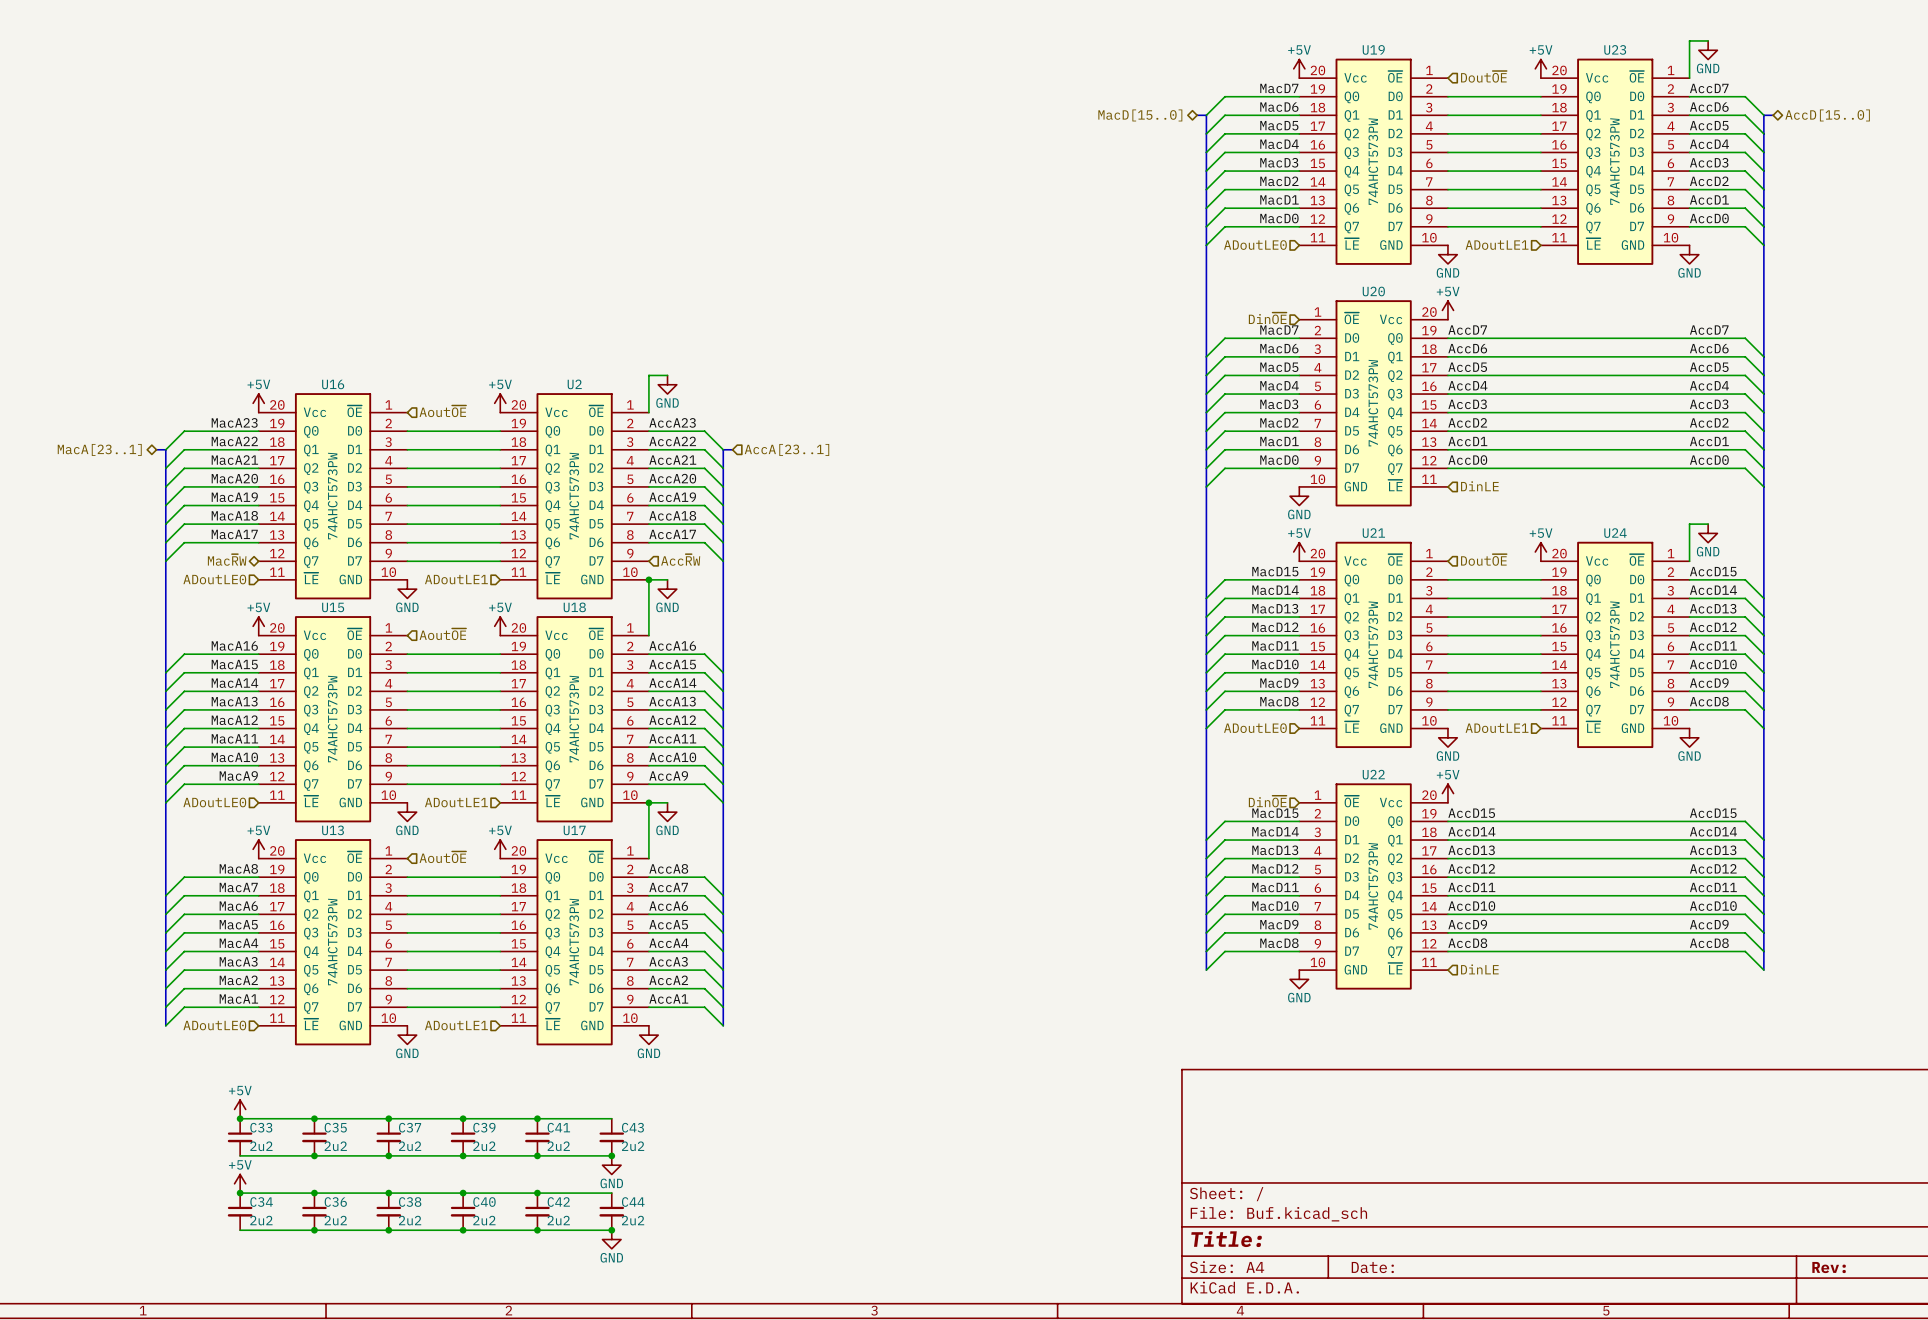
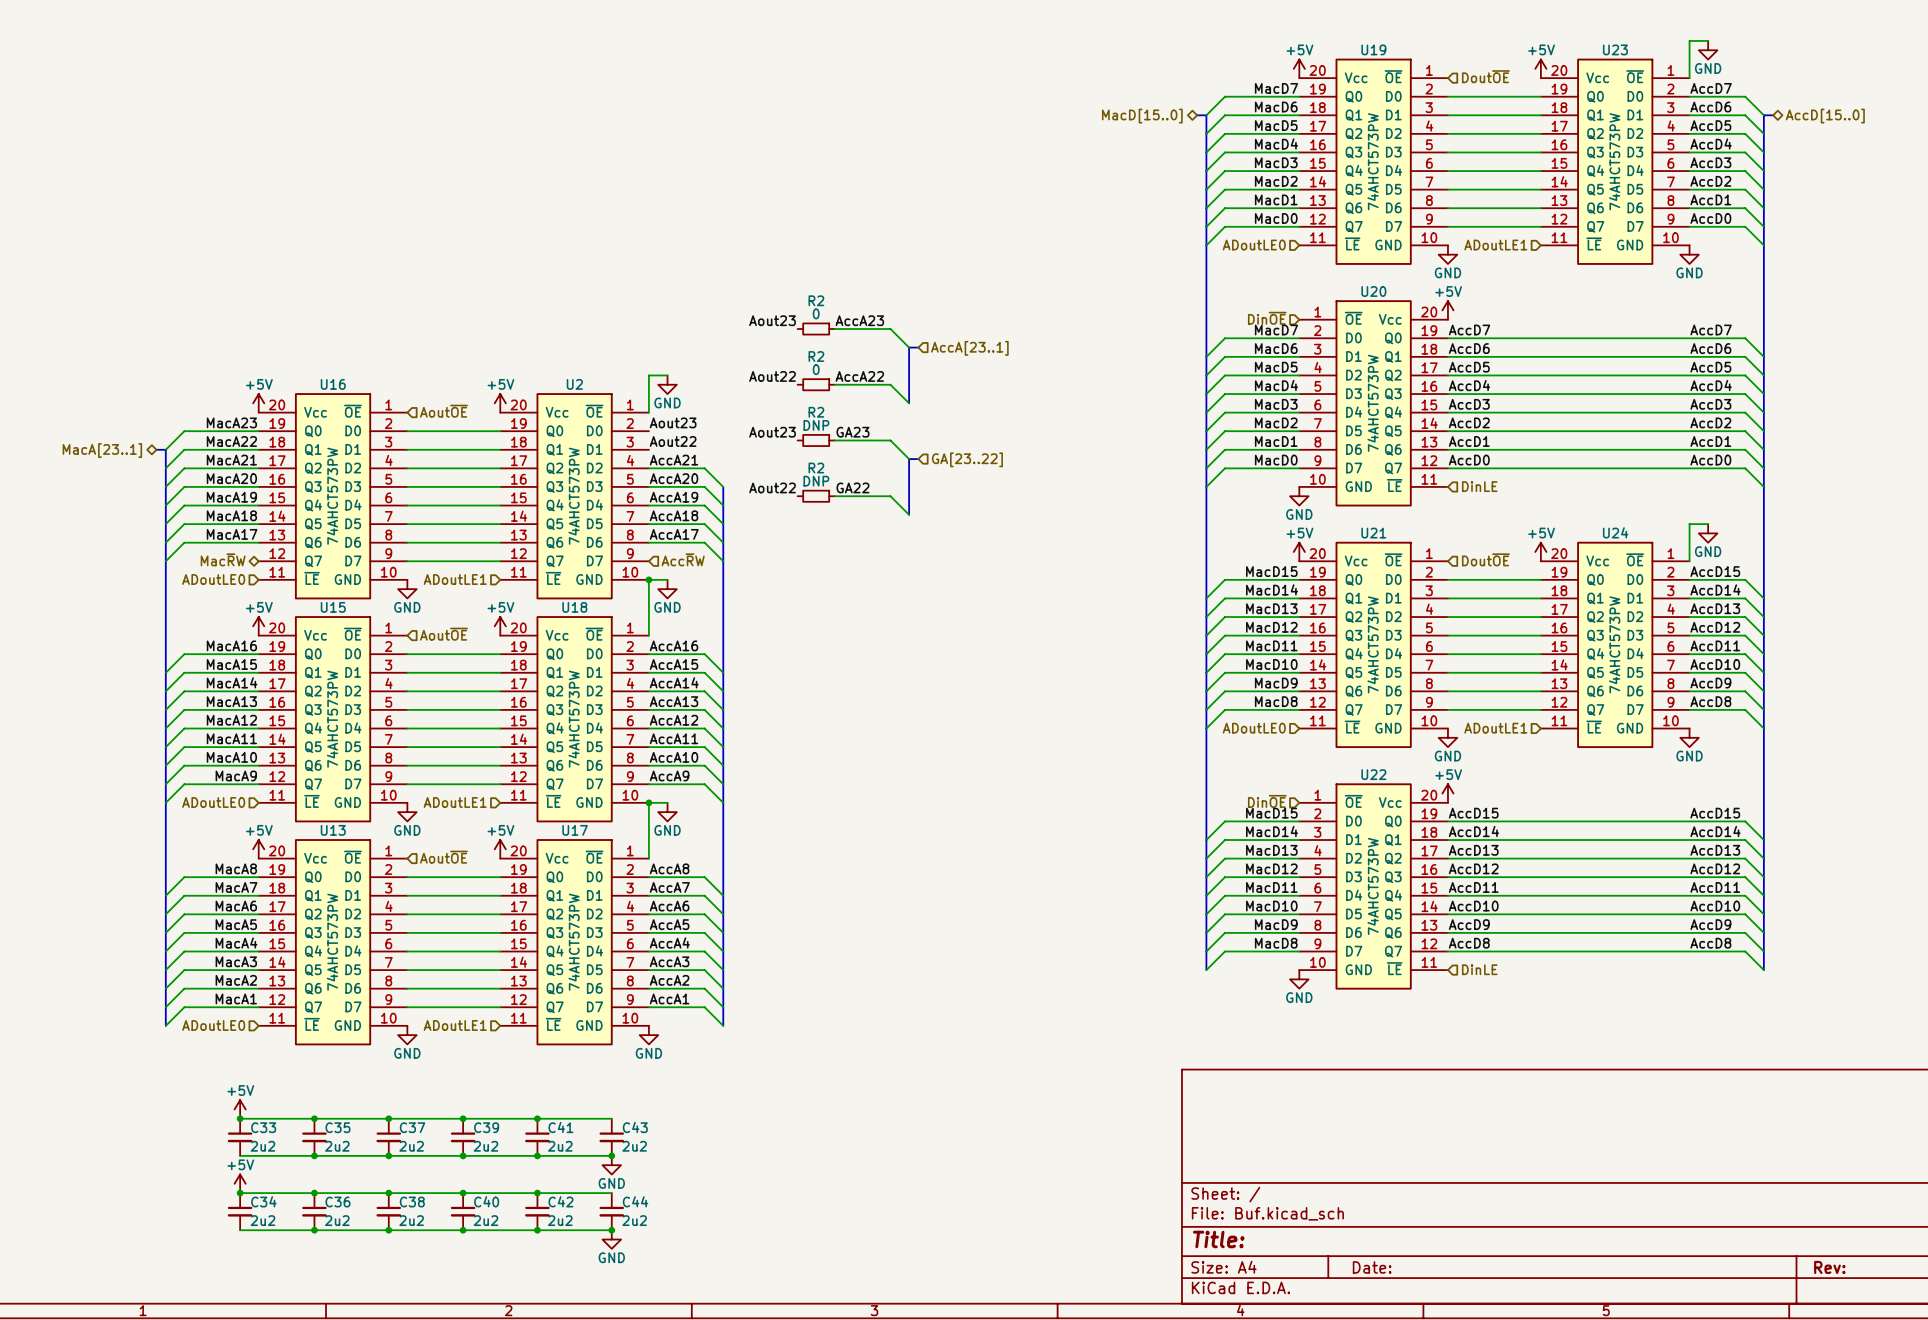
label: none -> Aout23 (772, 320)
label: none -> AccA23 (859, 320)
R2: none -> 0 (816, 329)
wire: none -> (834, 329) (890, 329) (909, 347)
bus: none -> (918, 347) (909, 347) (909, 403)
hierarchical label: none -> AccA[23..1] (969, 348)
label: none -> Aout22 (772, 376)
label: none -> AccA22 (859, 376)
R2: none -> 0 (816, 384)
wire: none -> (834, 384) (890, 384) (909, 403)
label: AccA23 (672, 422) -> Aout23 (673, 422)
wire: (648, 431) (704, 431) (723, 449) -> none
label: none -> Aout23 (772, 432)
label: none -> GA23 (852, 432)
R2: none -> DNP (816, 440)
wire: none -> (834, 440) (890, 440) (909, 459)
label: AccA22 (672, 441) -> Aout22 (673, 441)
wire: (648, 449) (704, 449) (723, 468) -> none
bus: (732, 449) (723, 449) (723, 486) -> none
hierarchical label: AccA[23..1] (786, 449) -> none
bus: none -> (918, 459) (909, 459) (909, 514)
hierarchical label: none -> GA[23..22] (967, 459)
label: none -> Aout22 (772, 487)
label: none -> GA22 (852, 487)
R2: none -> DNP (816, 496)
wire: none -> (834, 496) (890, 496) (909, 514)

